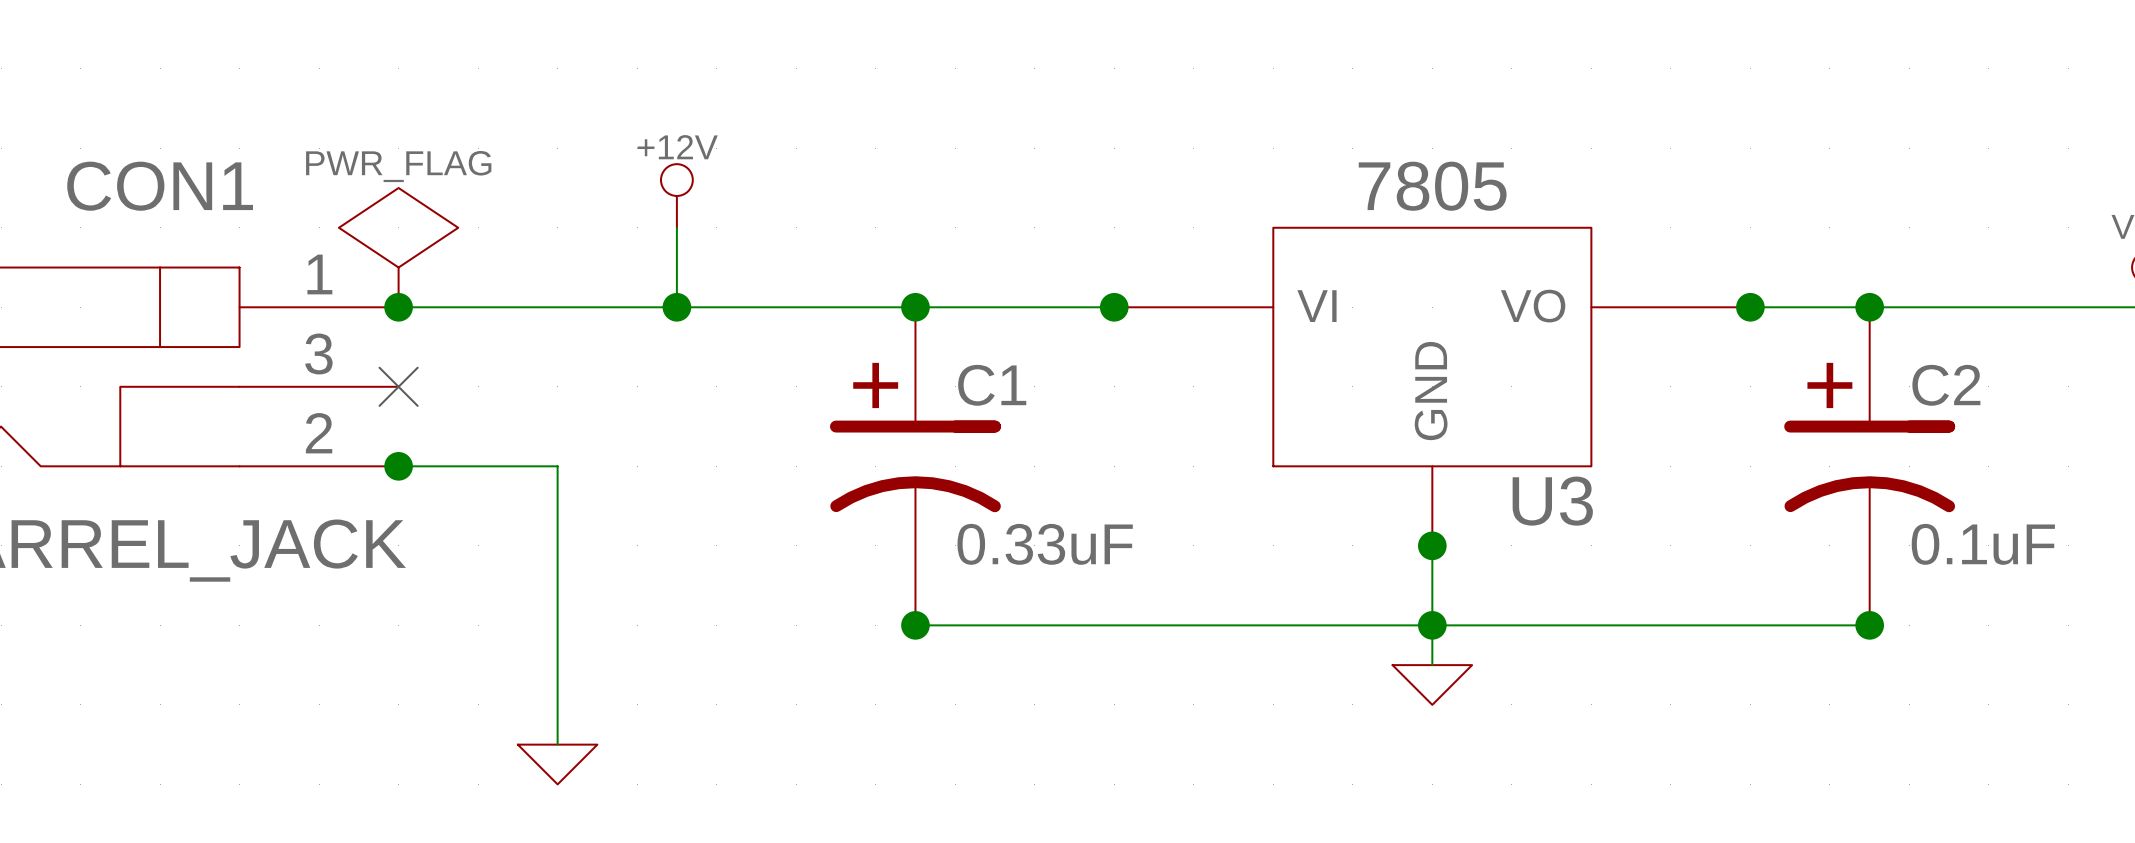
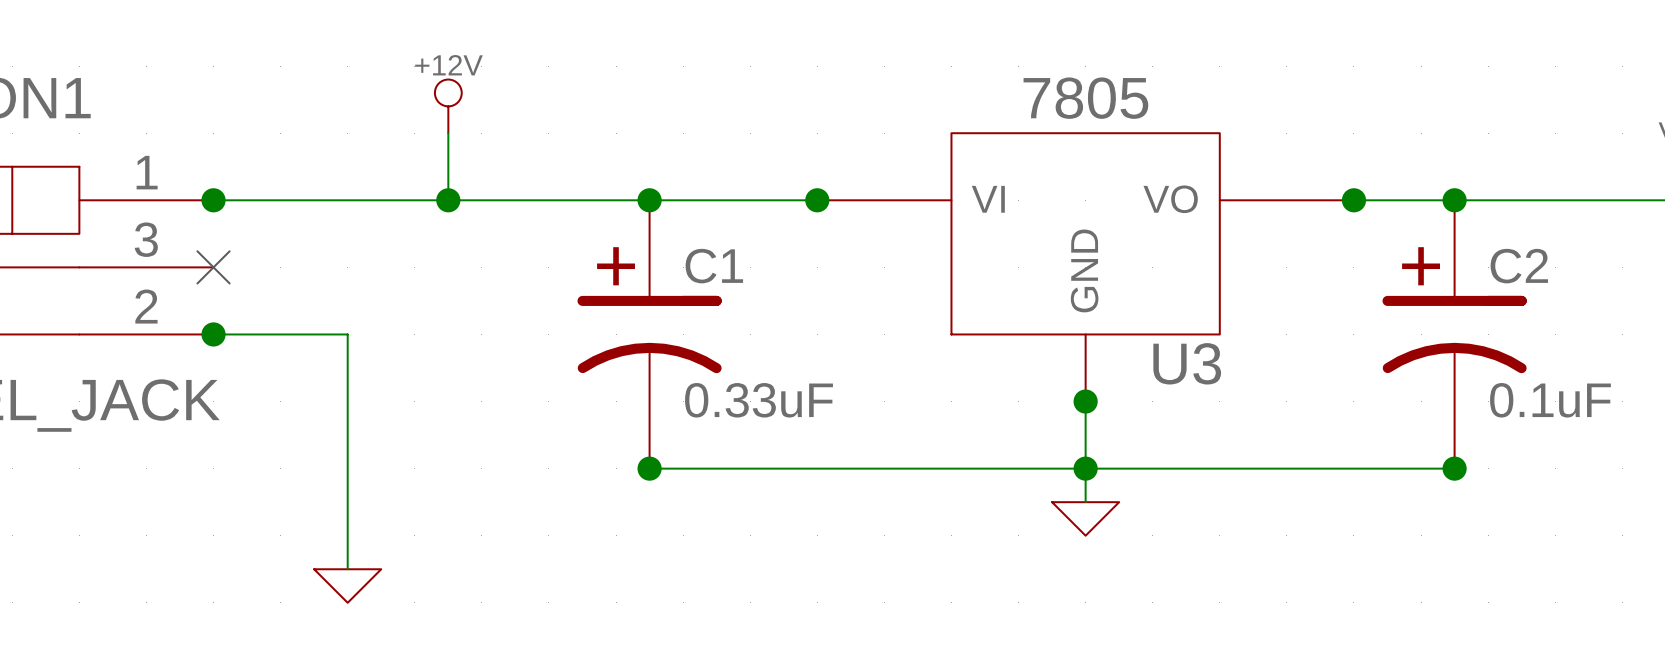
power symbol: PWR_FLAG (398, 247) -> none

